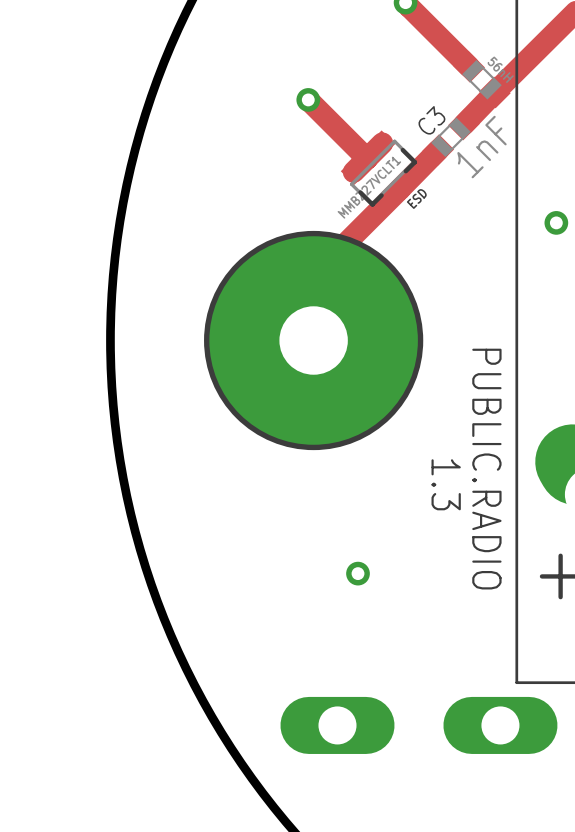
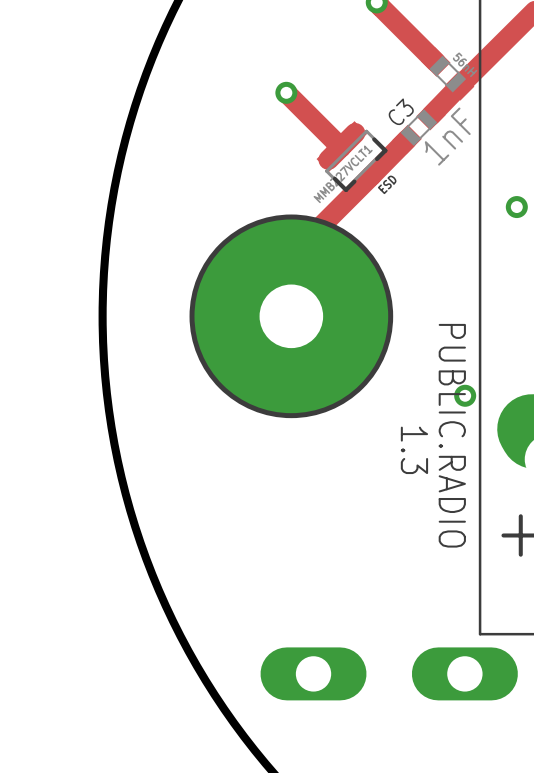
via: none -> (465, 395)
via: (358, 573) -> none

